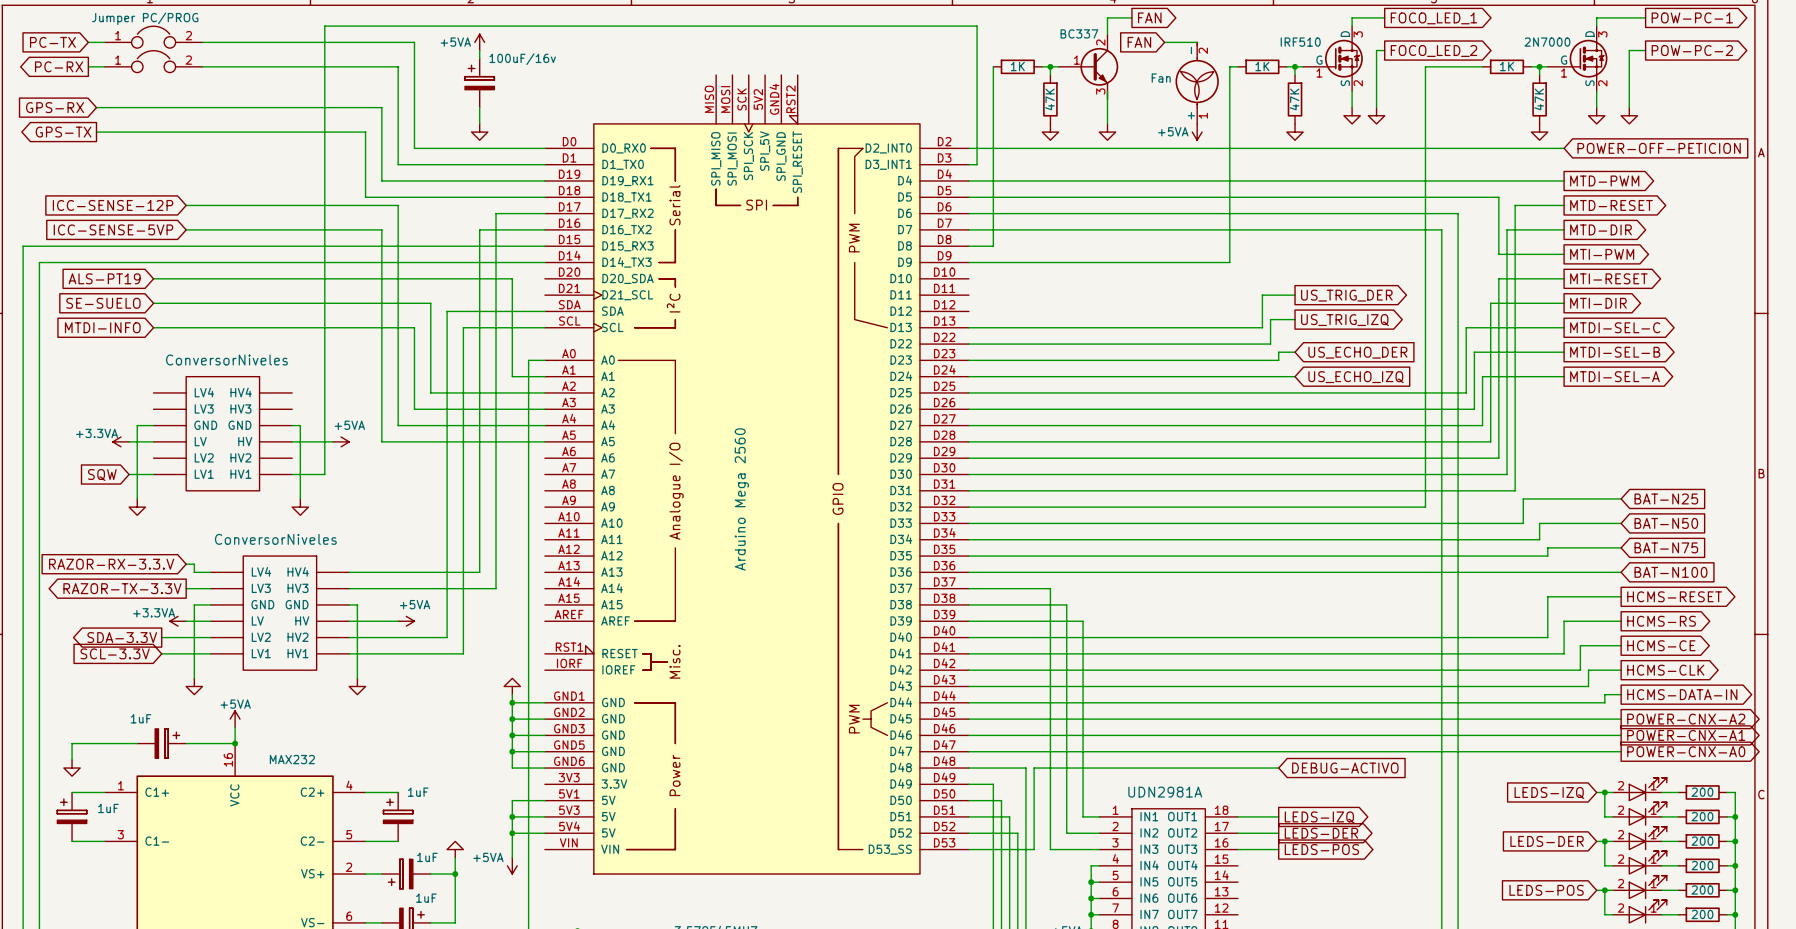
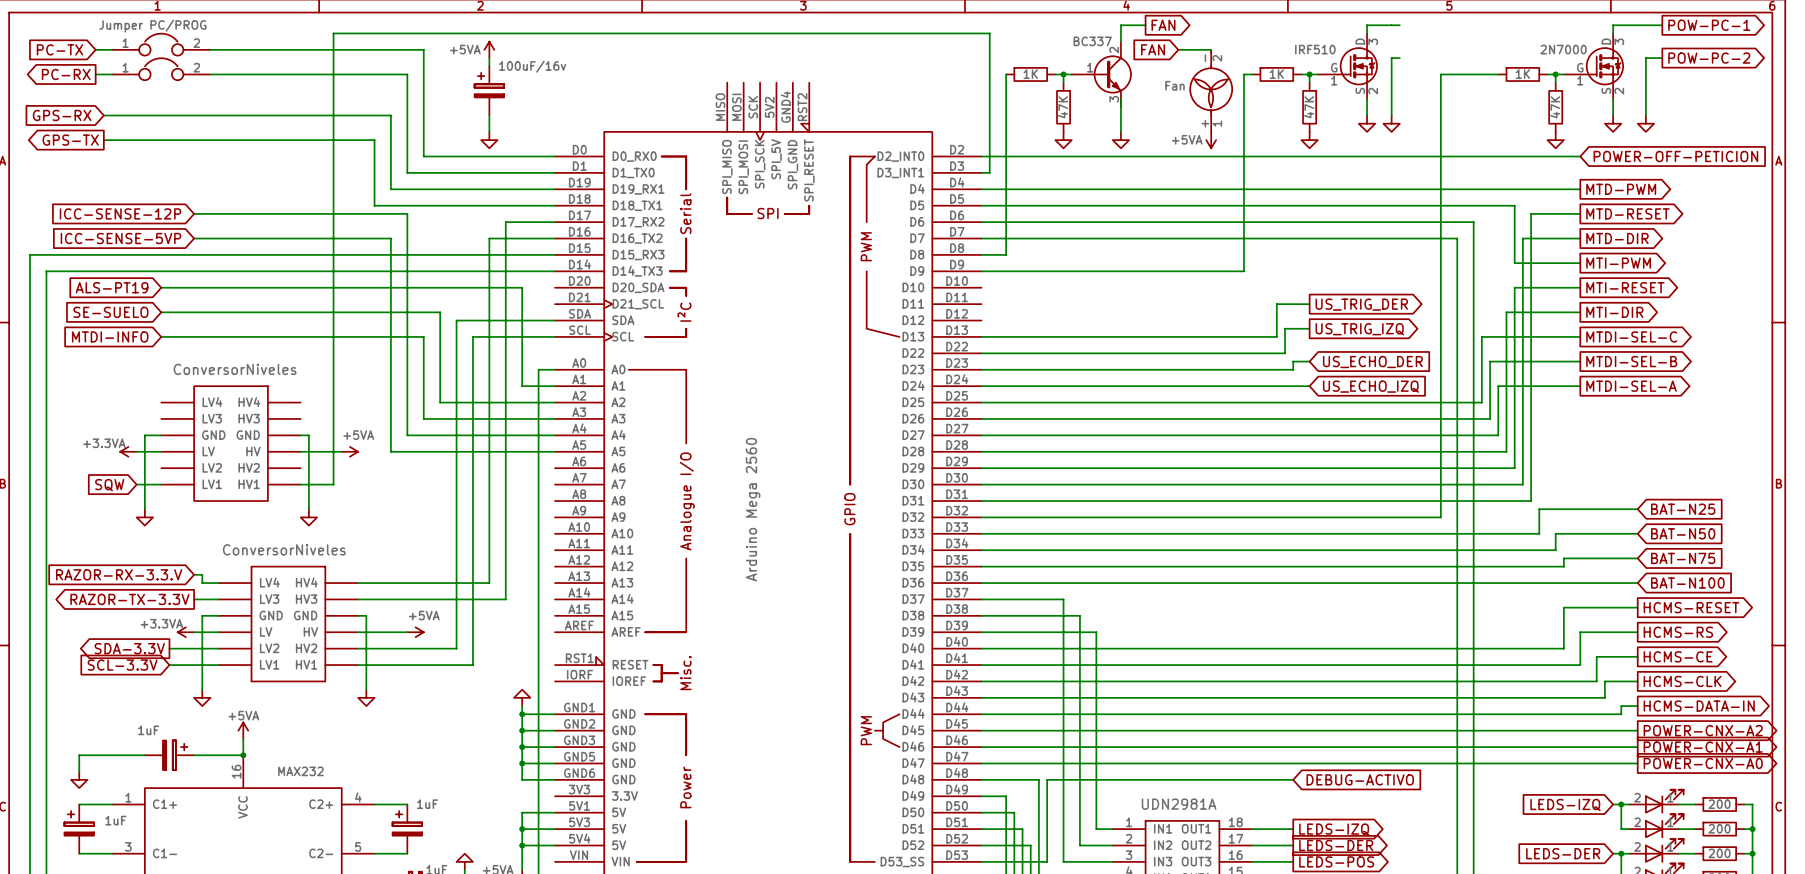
global label: FOCO_LED_1 (1433, 18) -> none
global label: FOCO_LED_2 (1433, 51) -> none

